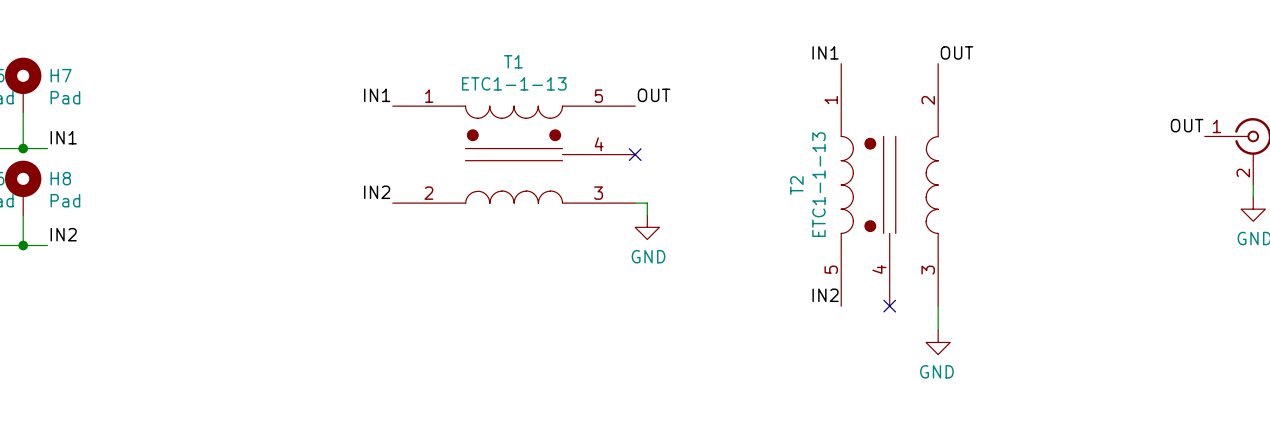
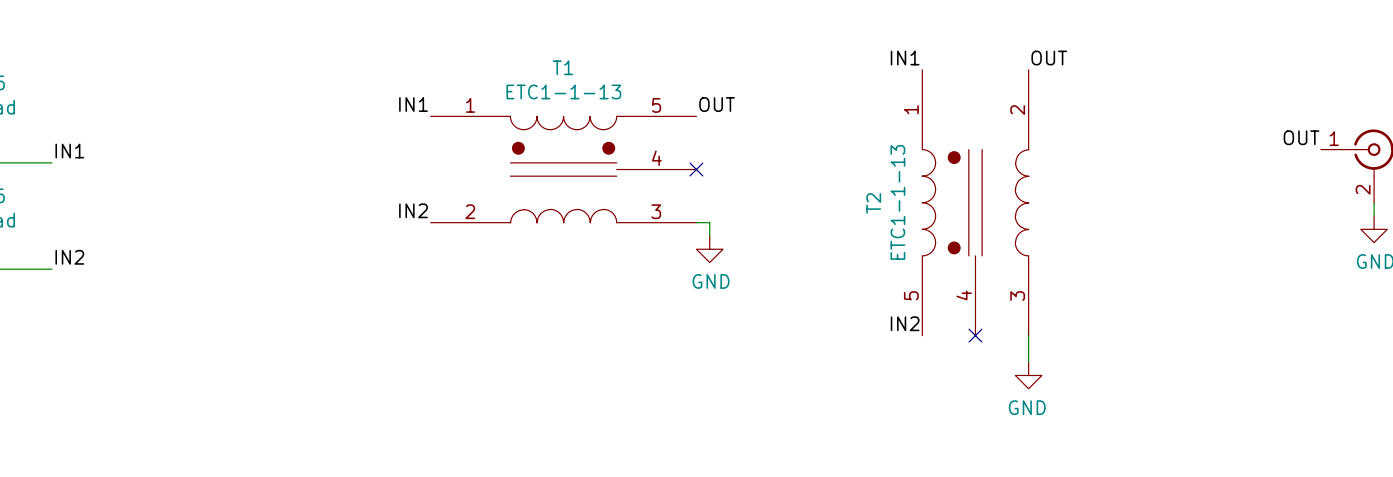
H7: Pad (23, 84) -> none
wire: (23, 112) (23, 148) -> none
junction: (23, 148) -> none
H8: Pad (23, 187) -> none
wire: (23, 215) (23, 245) -> none
junction: (23, 245) -> none

